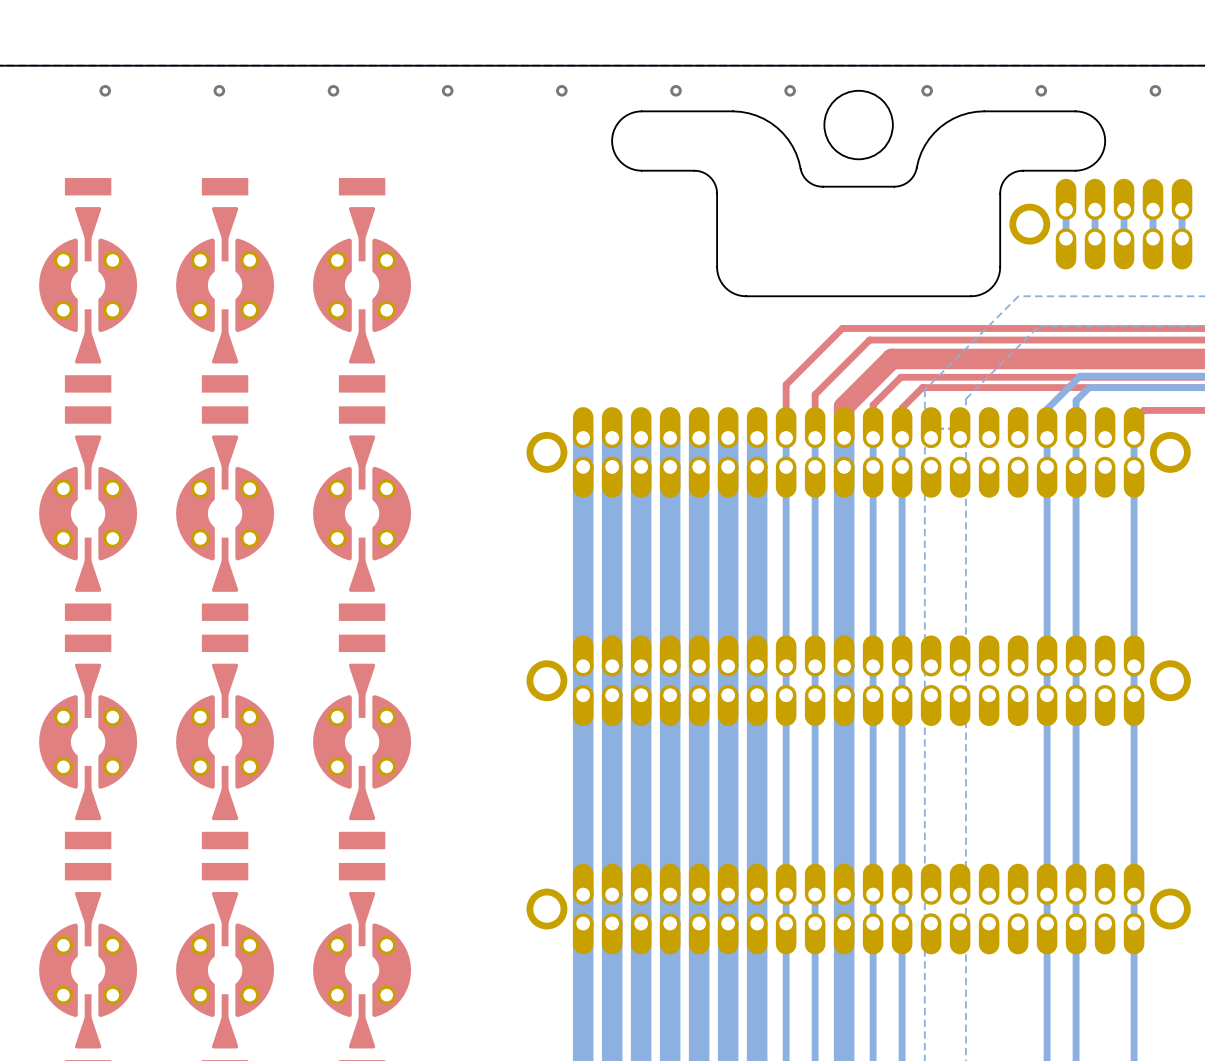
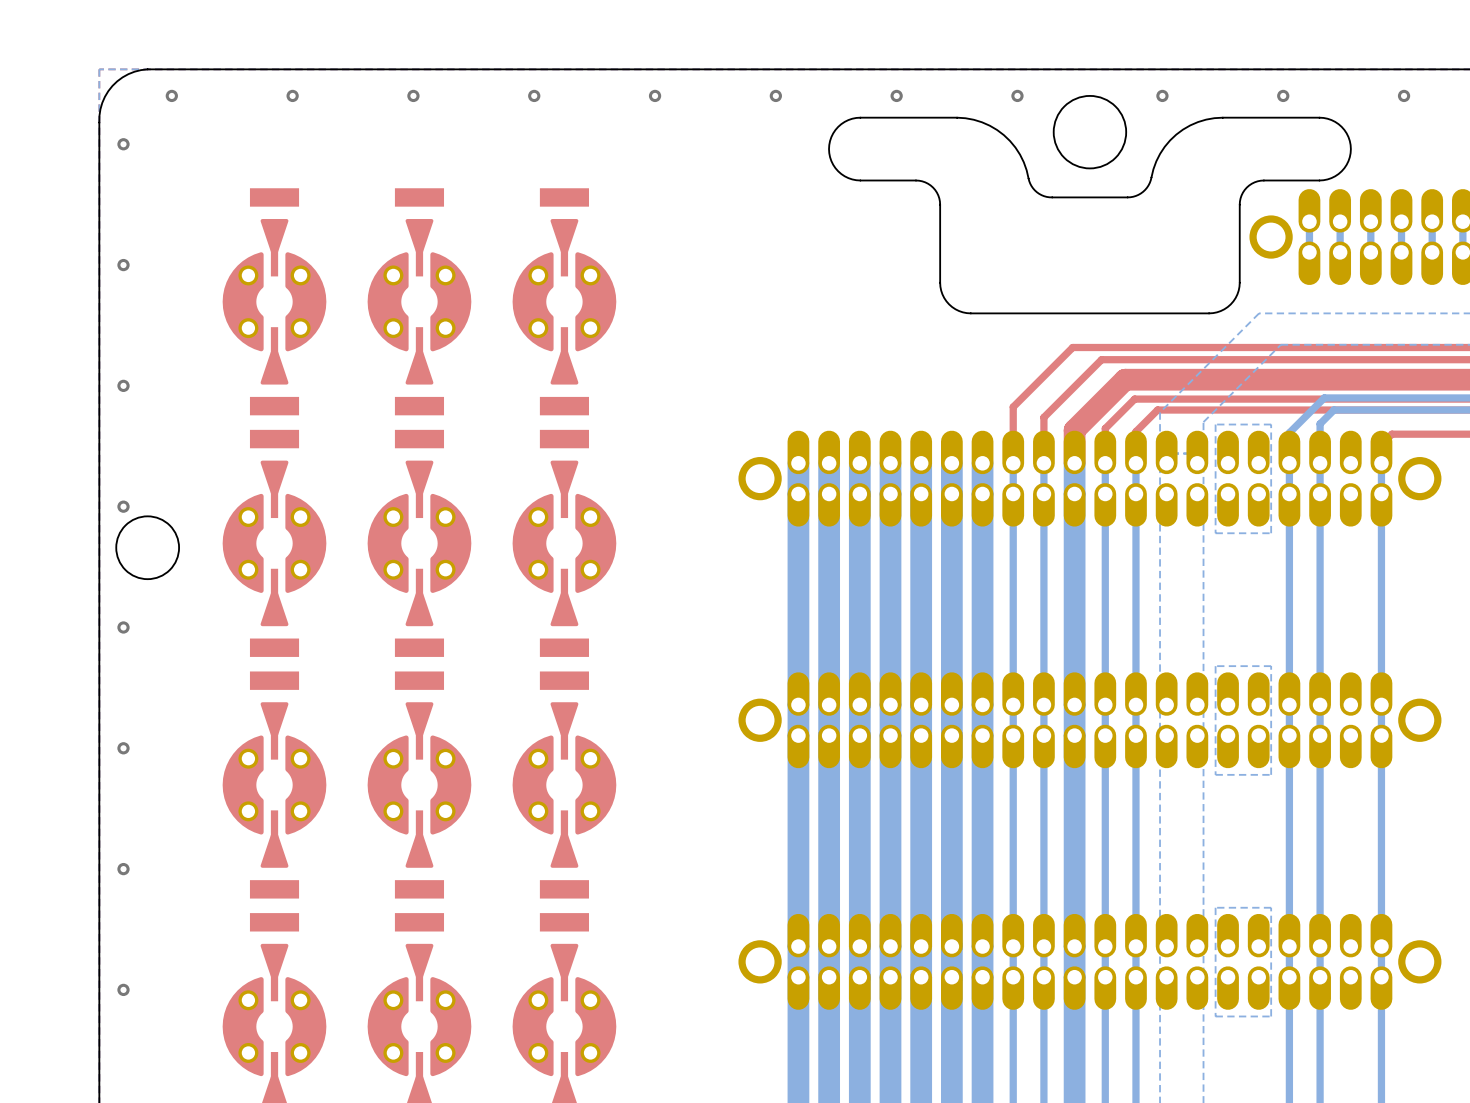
bottom zone outline: none -> (1271, 424) (1215, 424) (1215, 533) (1271, 533) (1271, 424)
bottom zone outline: none -> (1271, 666) (1271, 774) (1215, 774) (1215, 666) (1271, 666)
bottom zone outline: none -> (1271, 907) (1271, 1016) (1215, 1016) (1215, 907) (1271, 907)

